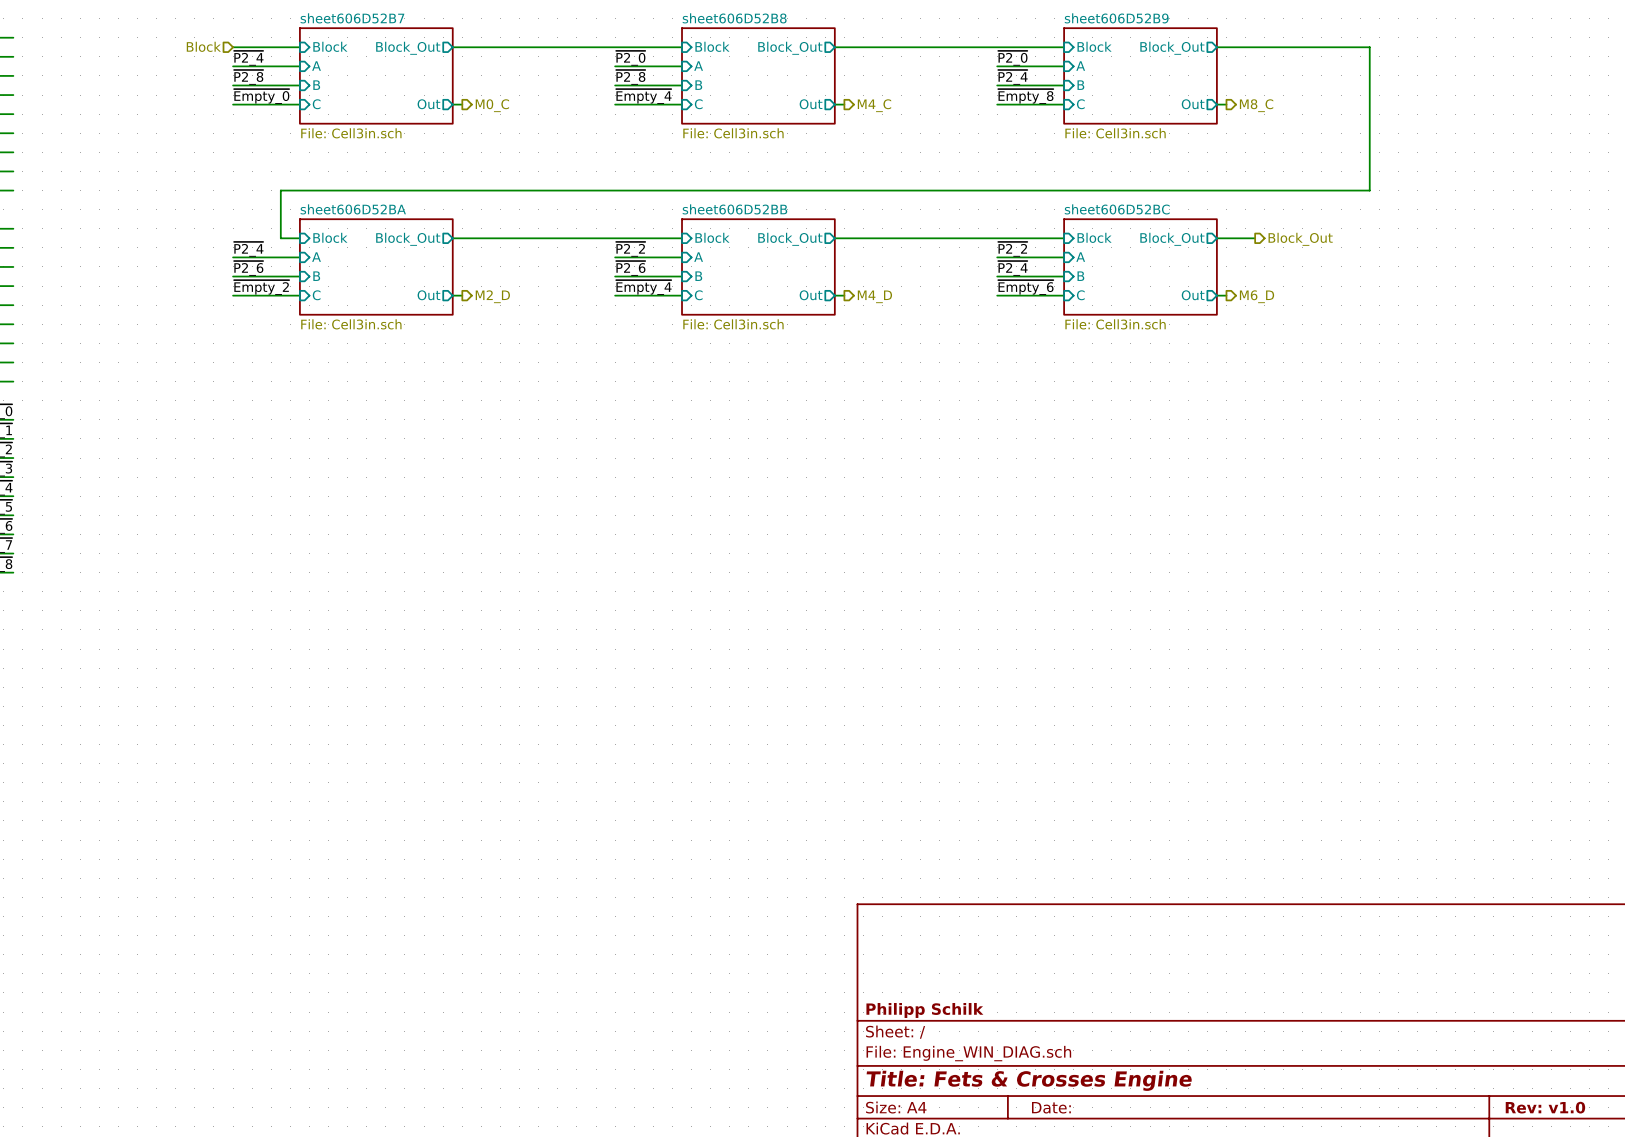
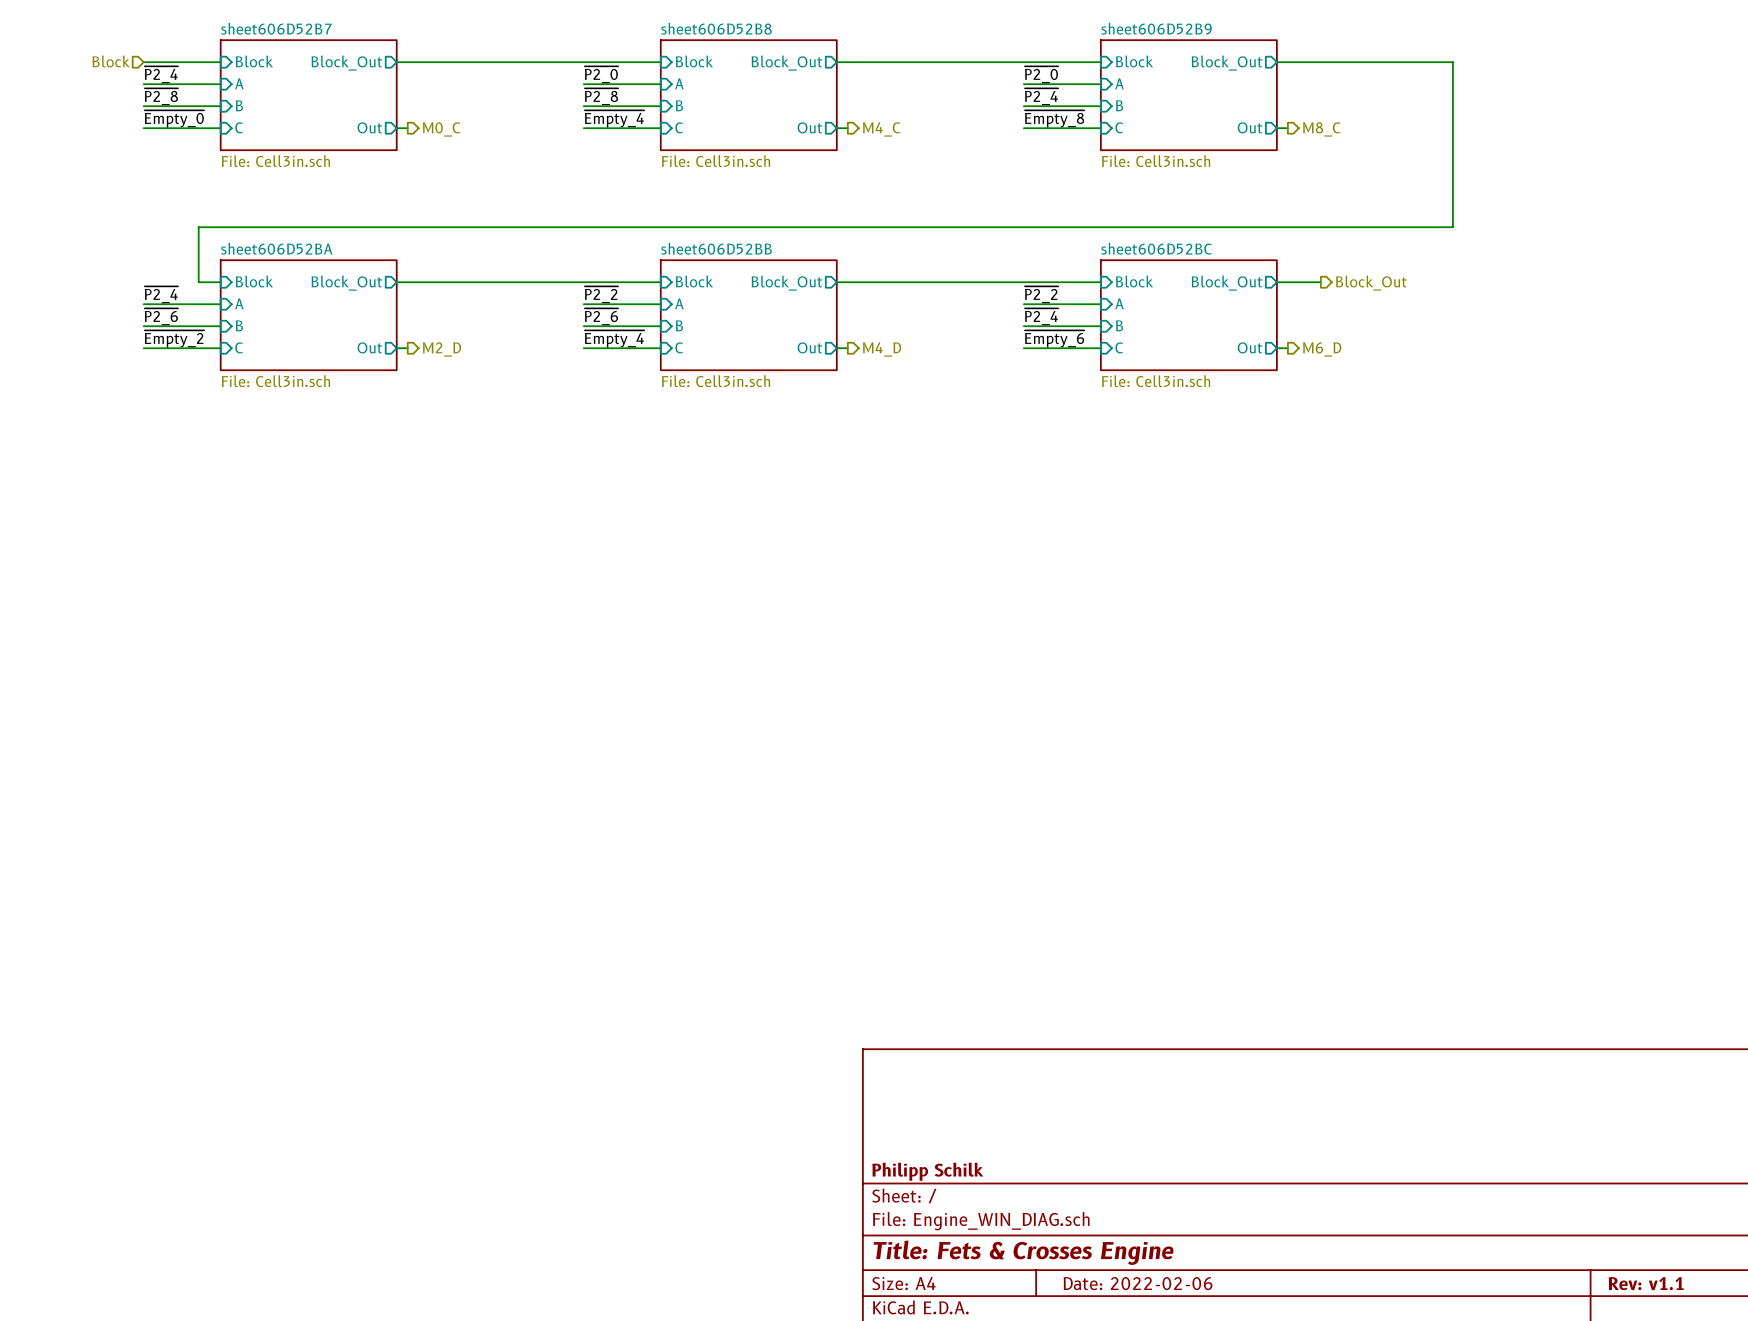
title block: Date: (1051, 1107) -> Date: 2022-02-06 (1138, 1283)
title block: Rev: v1.0 (1545, 1107) -> Rev: v1.1 (1646, 1283)

